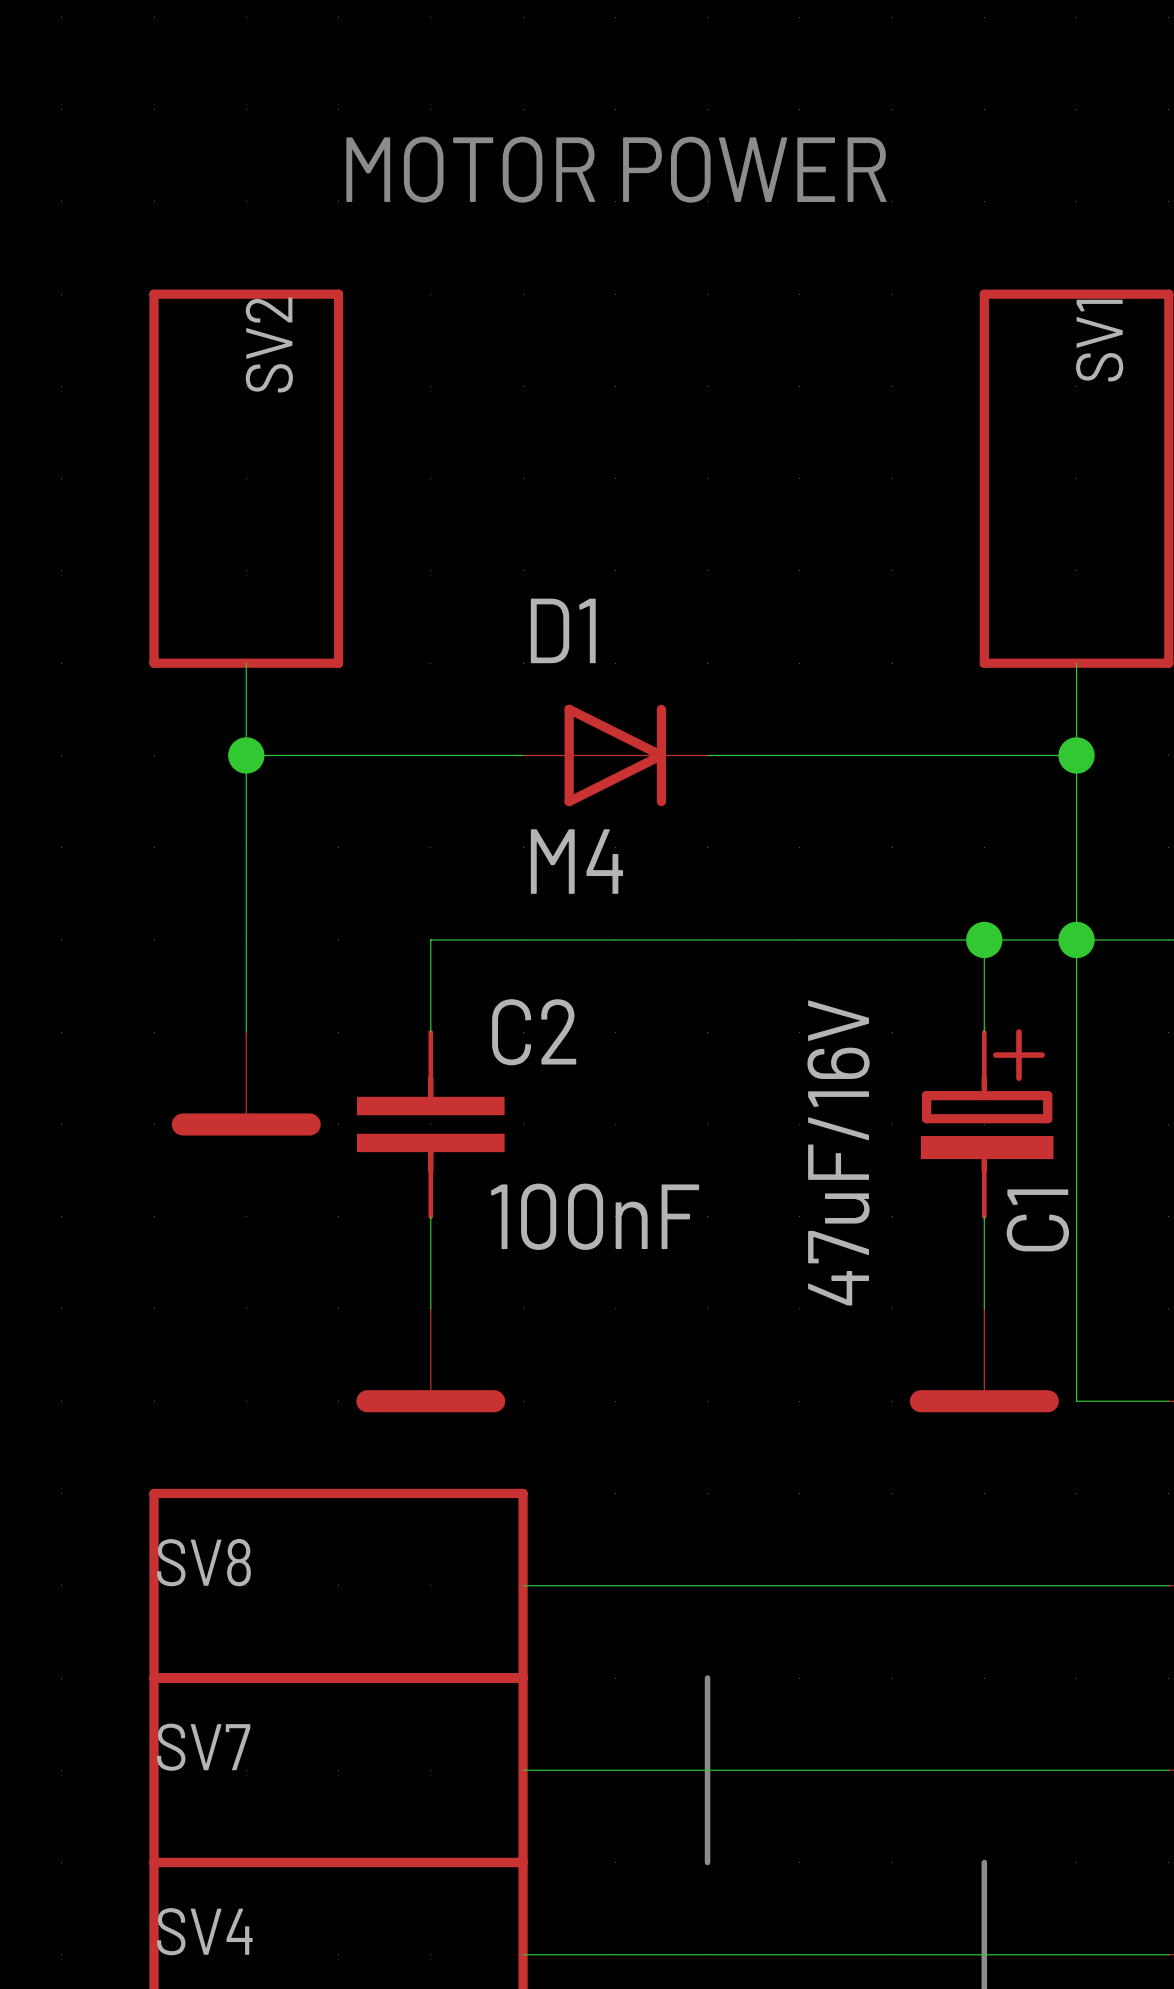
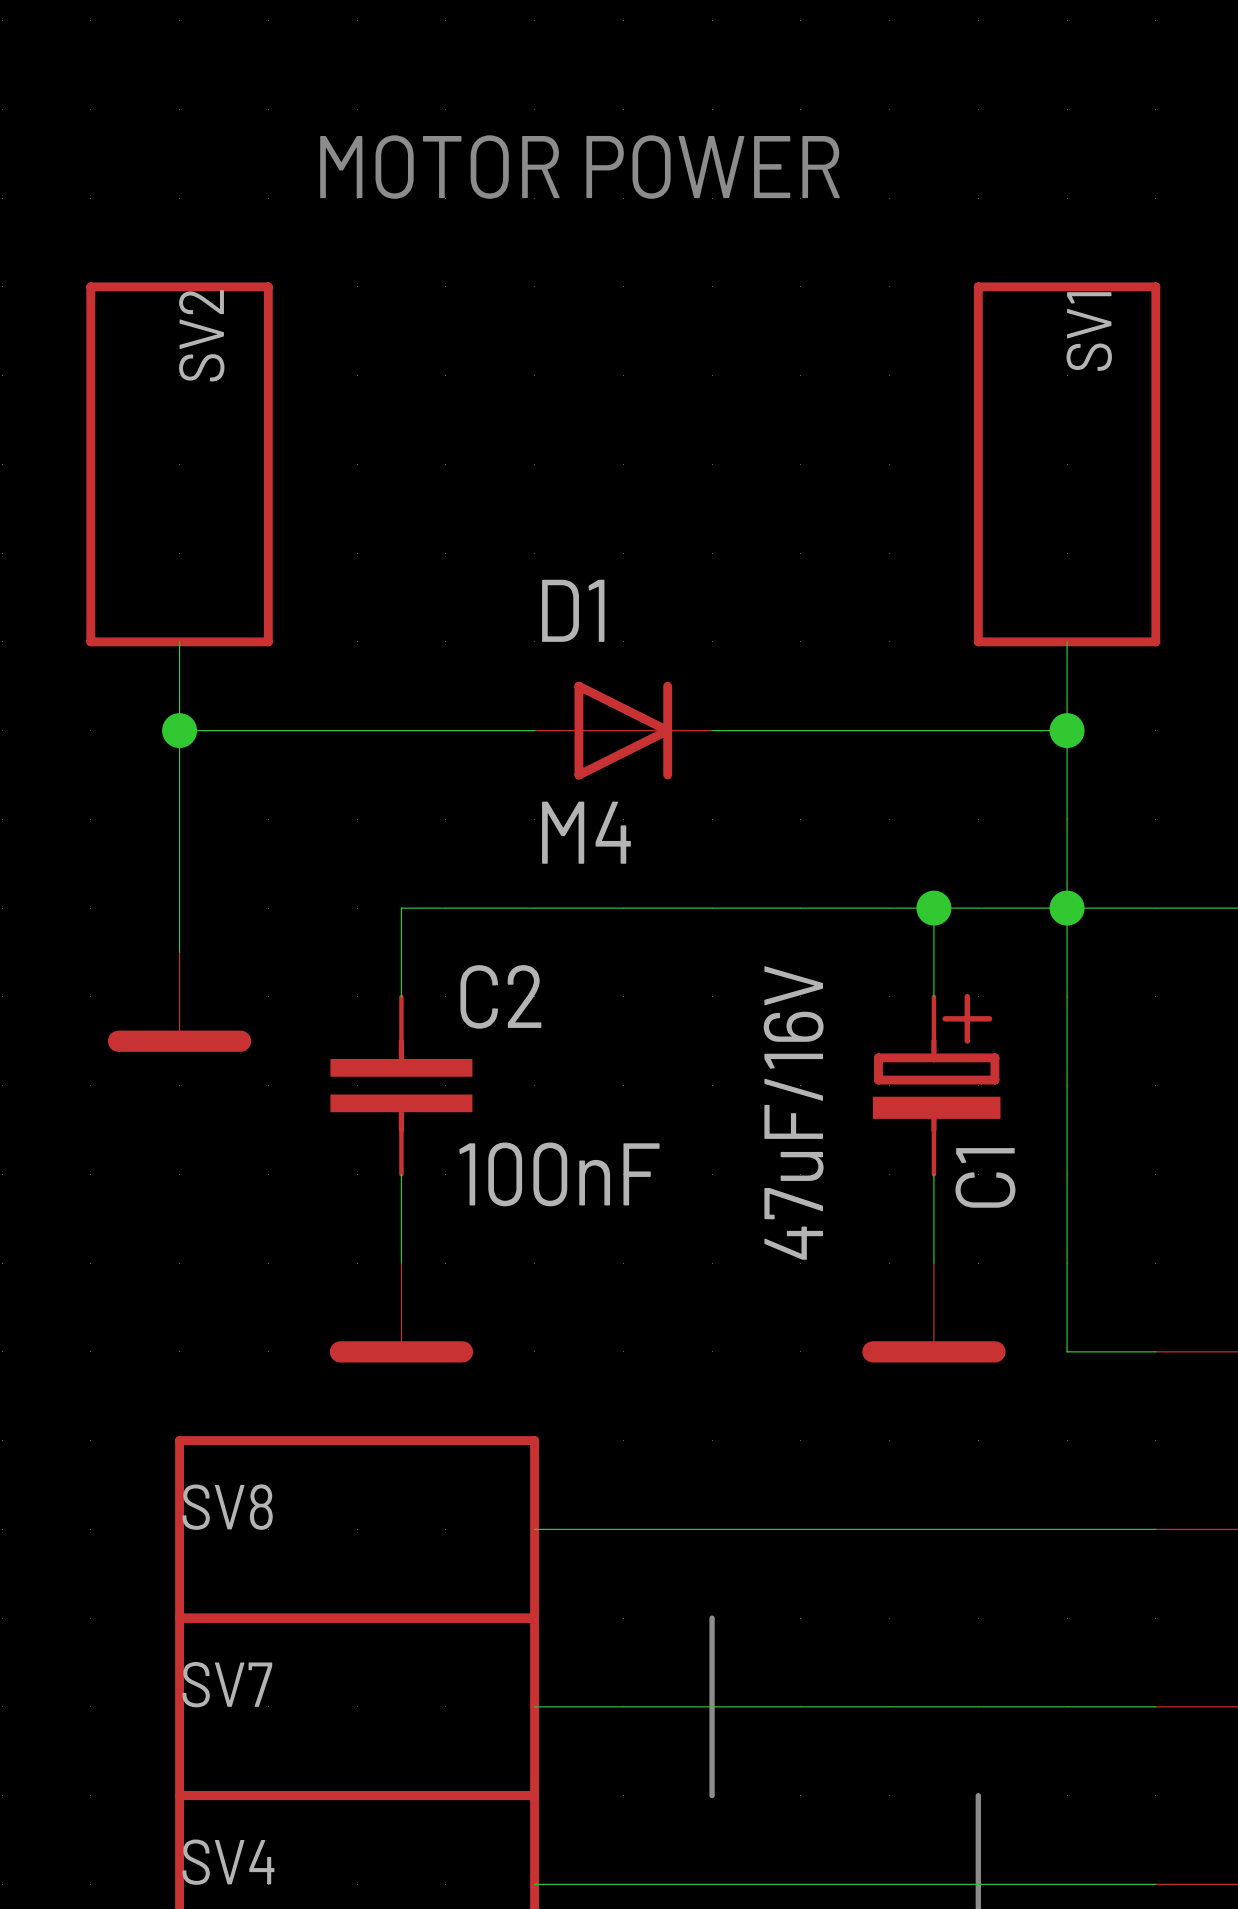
text position: MOTOR POWER (616, 169) -> MOTOR POWER (580, 167)
SV2 position: (246, 478) -> (179, 464)
wire: none -> (179, 641) (179, 952)
wire: (246, 663) (246, 1032) -> none
wire: none -> (179, 730) (268, 730)
junction position: (246, 755) -> (179, 730)
wire: (430, 939) (430, 1032) -> (445, 908) (401, 908) (401, 996)
wire: (984, 939) (984, 1032) -> (933, 908) (933, 996)
junction position: (984, 939) -> (933, 908)
power symbol position: (246, 1083) -> (179, 1002)
C2 position: (430, 1124) -> (401, 1085)
C1 position: (987, 1124) -> (936, 1085)
wire: (430, 1216) (430, 1308) -> (401, 1174) (401, 1263)
wire: (984, 1216) (984, 1308) -> (933, 1174) (933, 1263)
power symbol position: (430, 1360) -> (401, 1312)
power symbol position: (984, 1360) -> (933, 1312)

